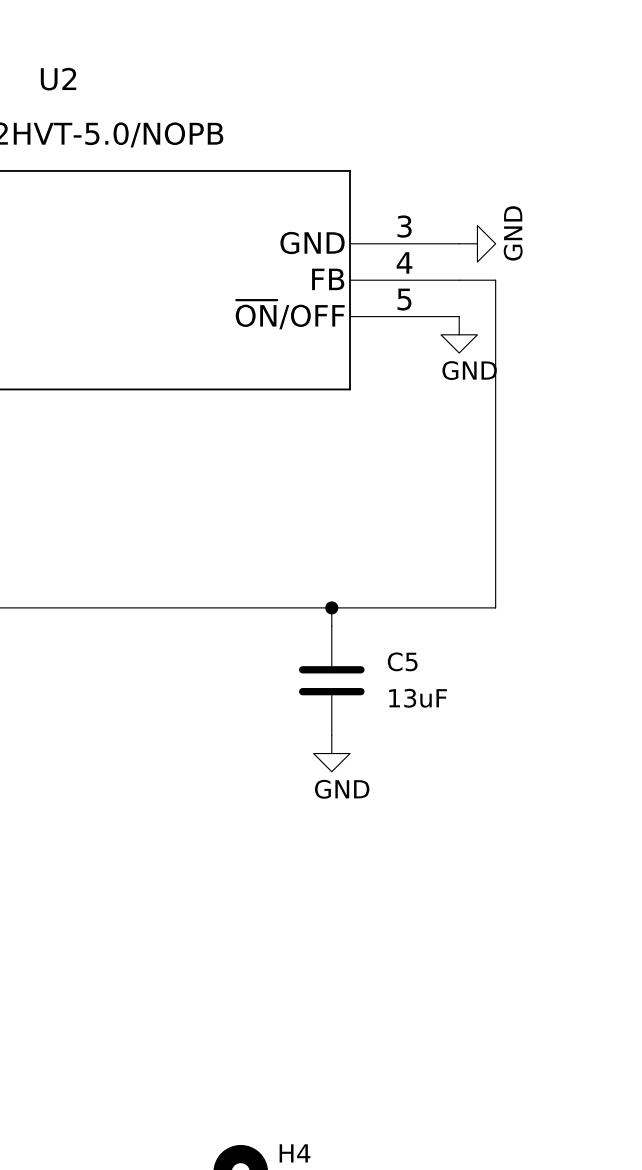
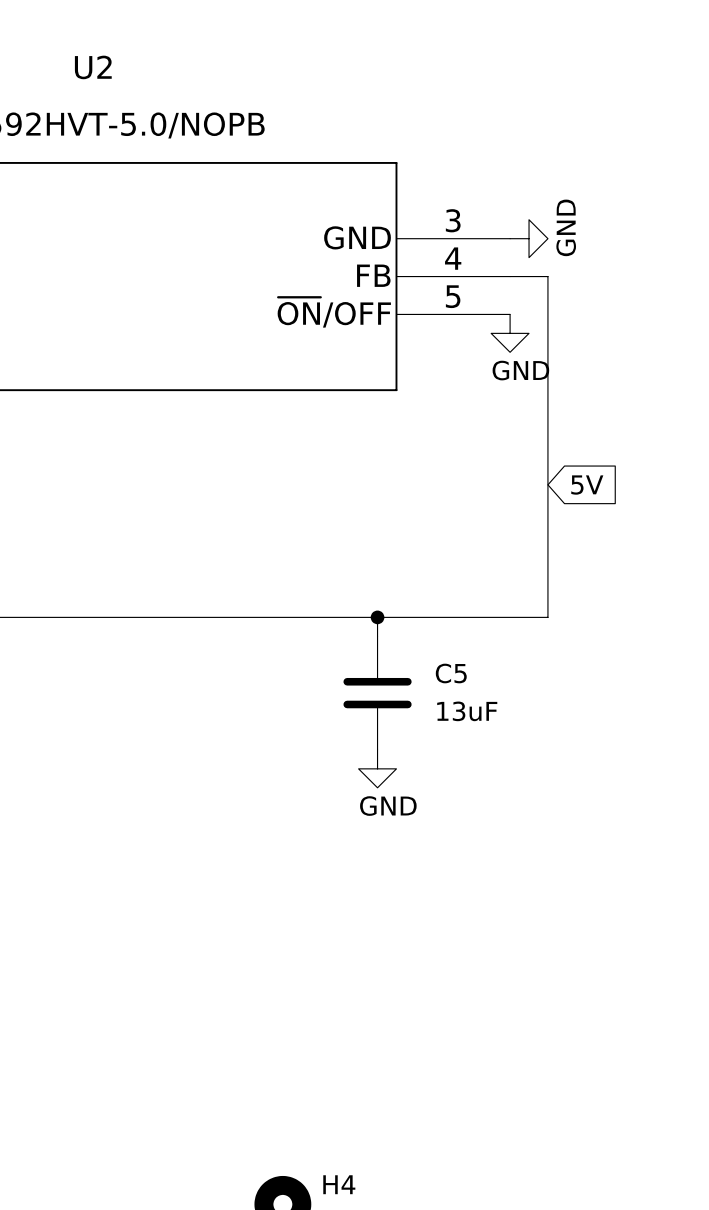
global label: none -> 5V (587, 485)

